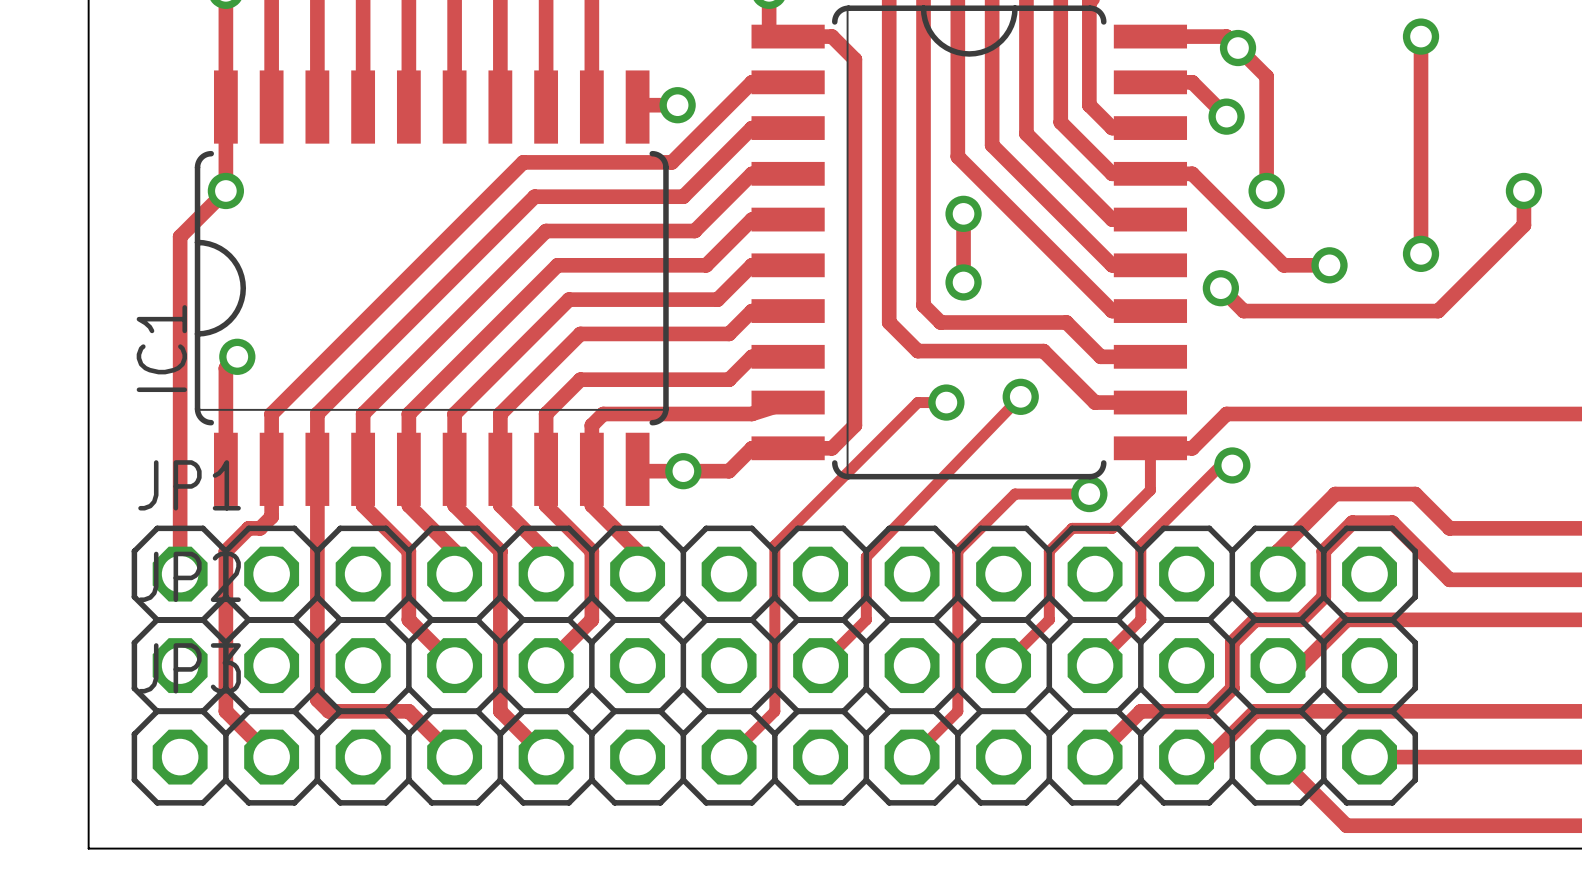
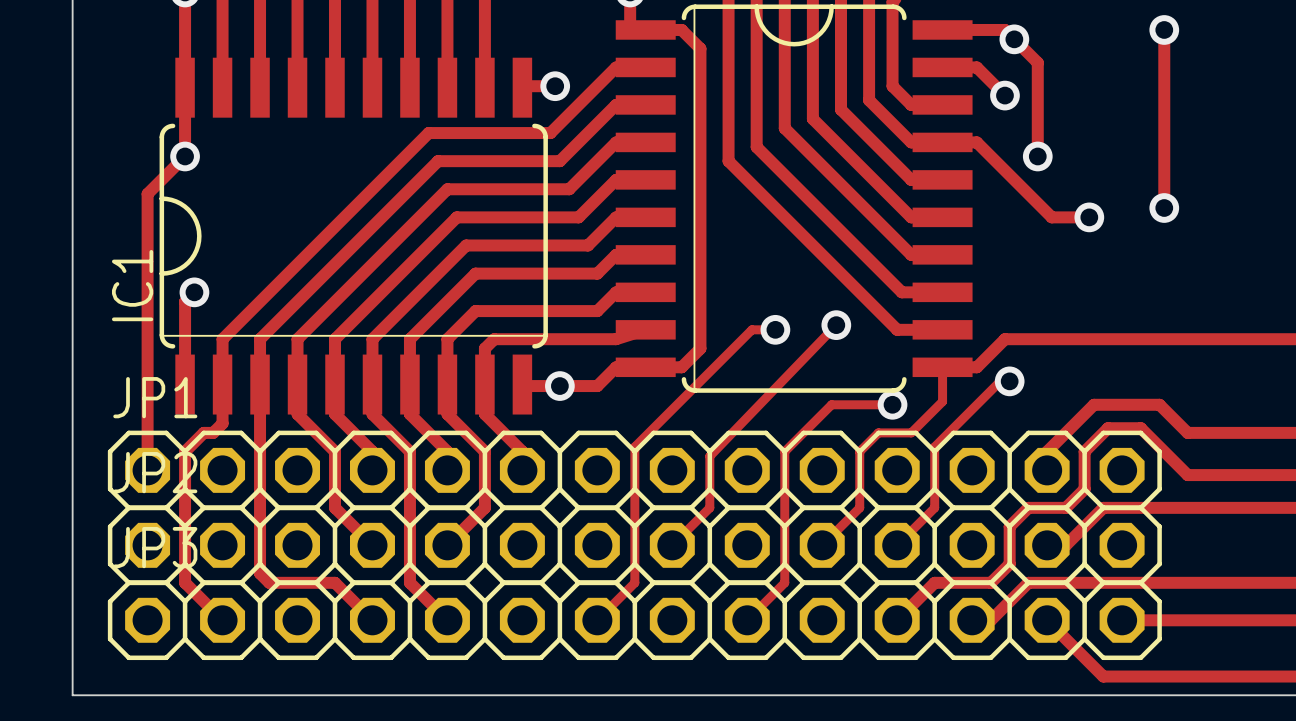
track: (923, 179) (923, 305) (940, 322) (1066, 322) -> (756, 147) (873, 264)
track: (1523, 190) (1523, 225) (1438, 311) (1243, 311) (1220, 288) -> none
via: (1523, 190) -> none
track: (889, 196) (889, 322) (917, 351) (1043, 351) -> (728, 161) (855, 287)
track: (963, 213) (963, 282) -> none
via: (963, 213) -> none
via: (963, 282) -> none
via: (1220, 288) -> none

